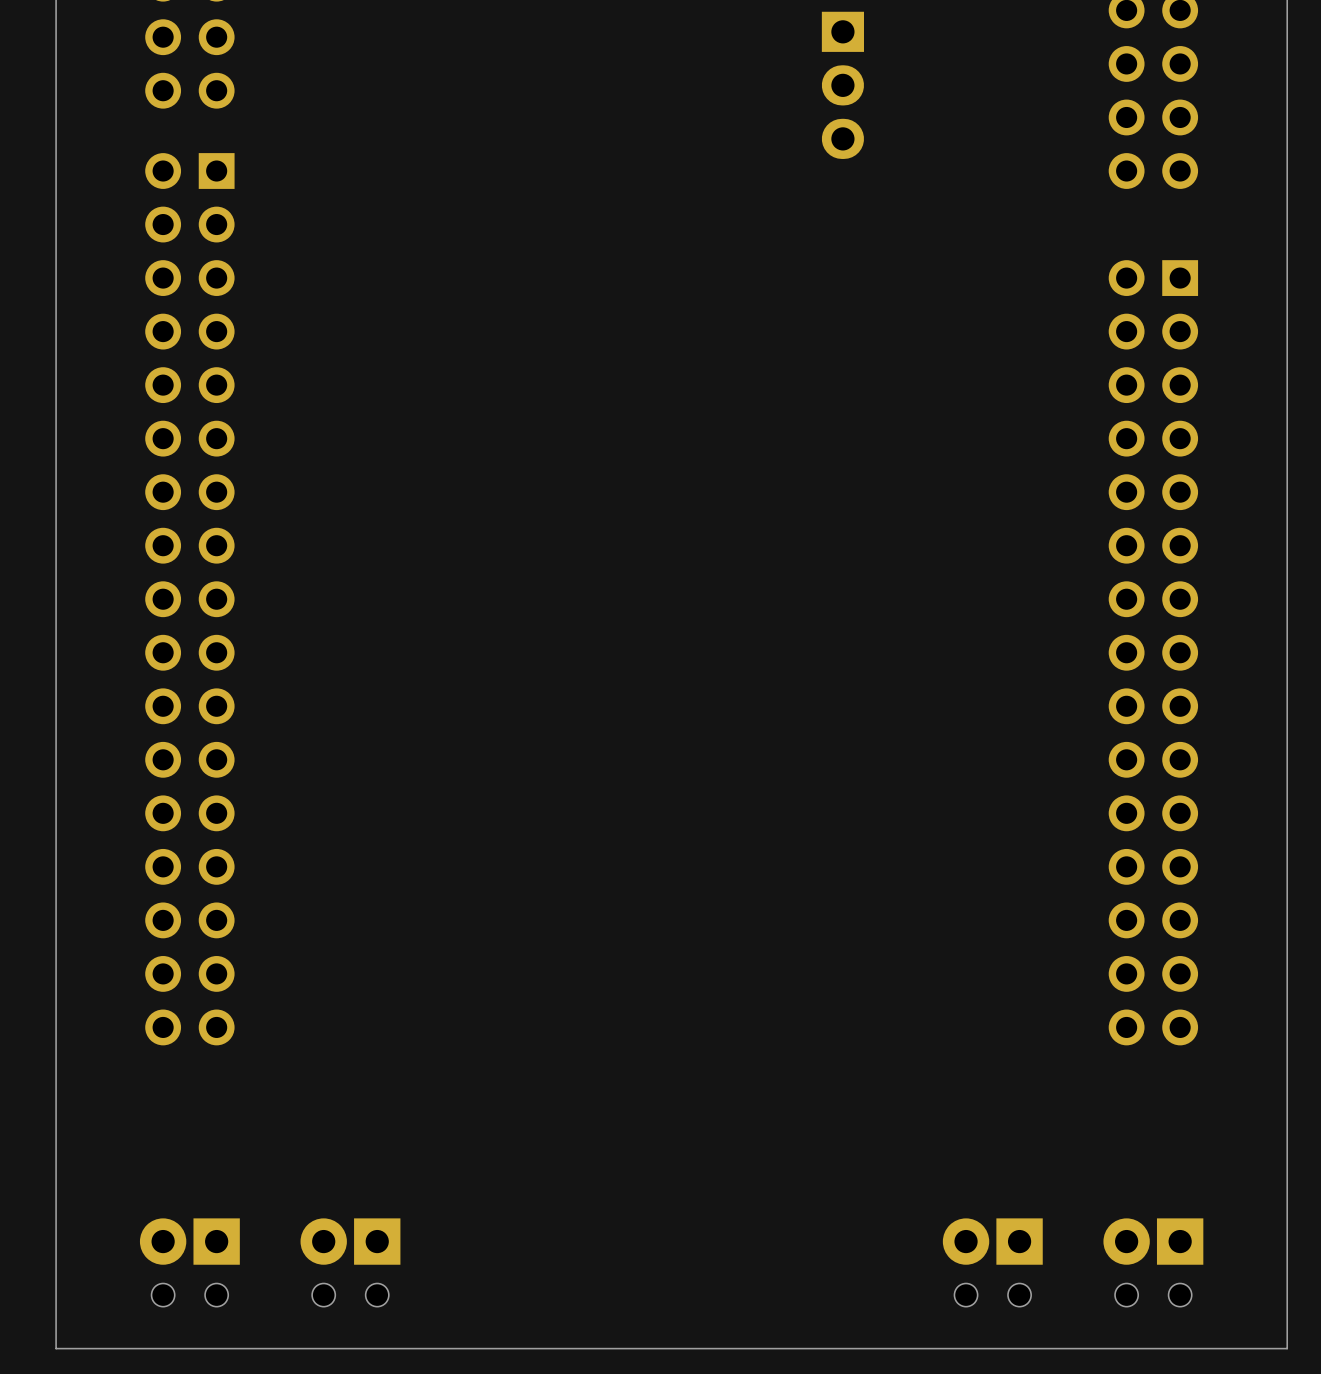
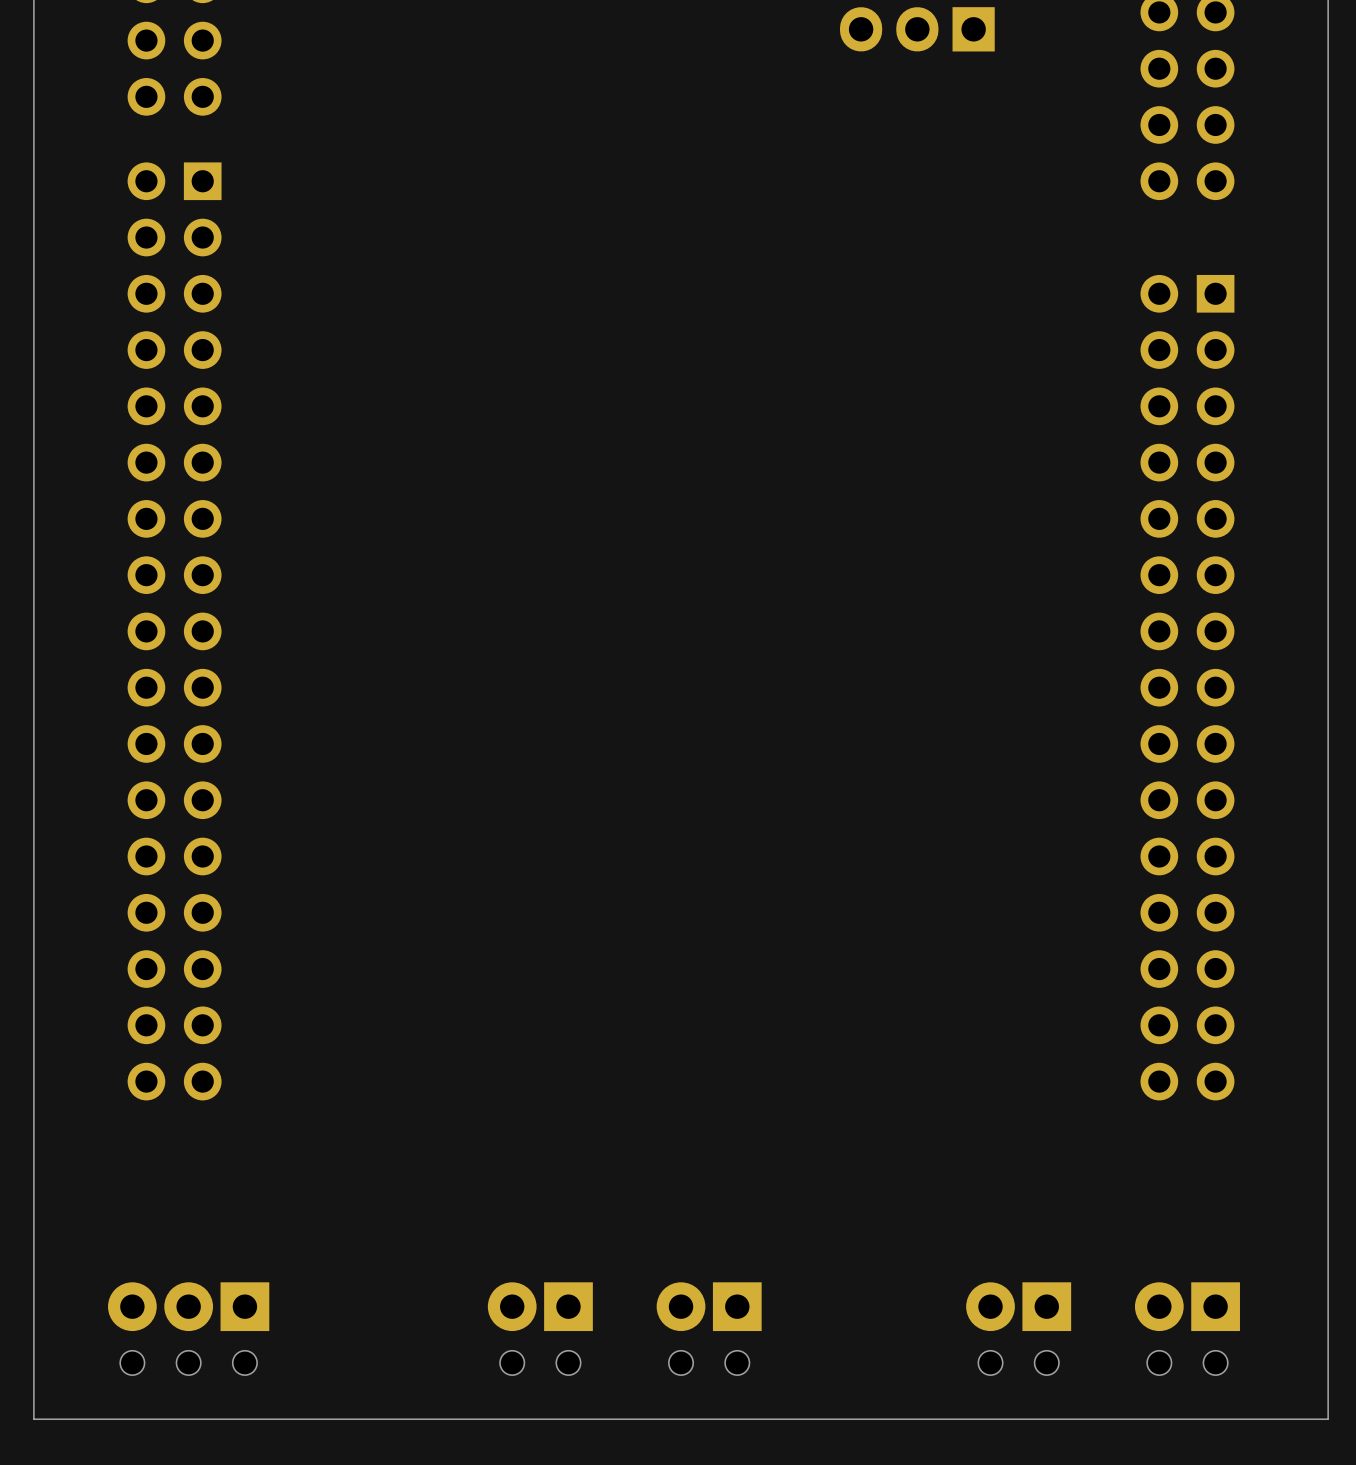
part rotation: 0° (842, 85) -> 90° clockwise (917, 29)
part footprint: [139, 1218, 240, 1307] -> [108, 1282, 270, 1376]
part: (350, 1262) -> none
part: none -> (540, 1328)
part: none -> (709, 1328)

